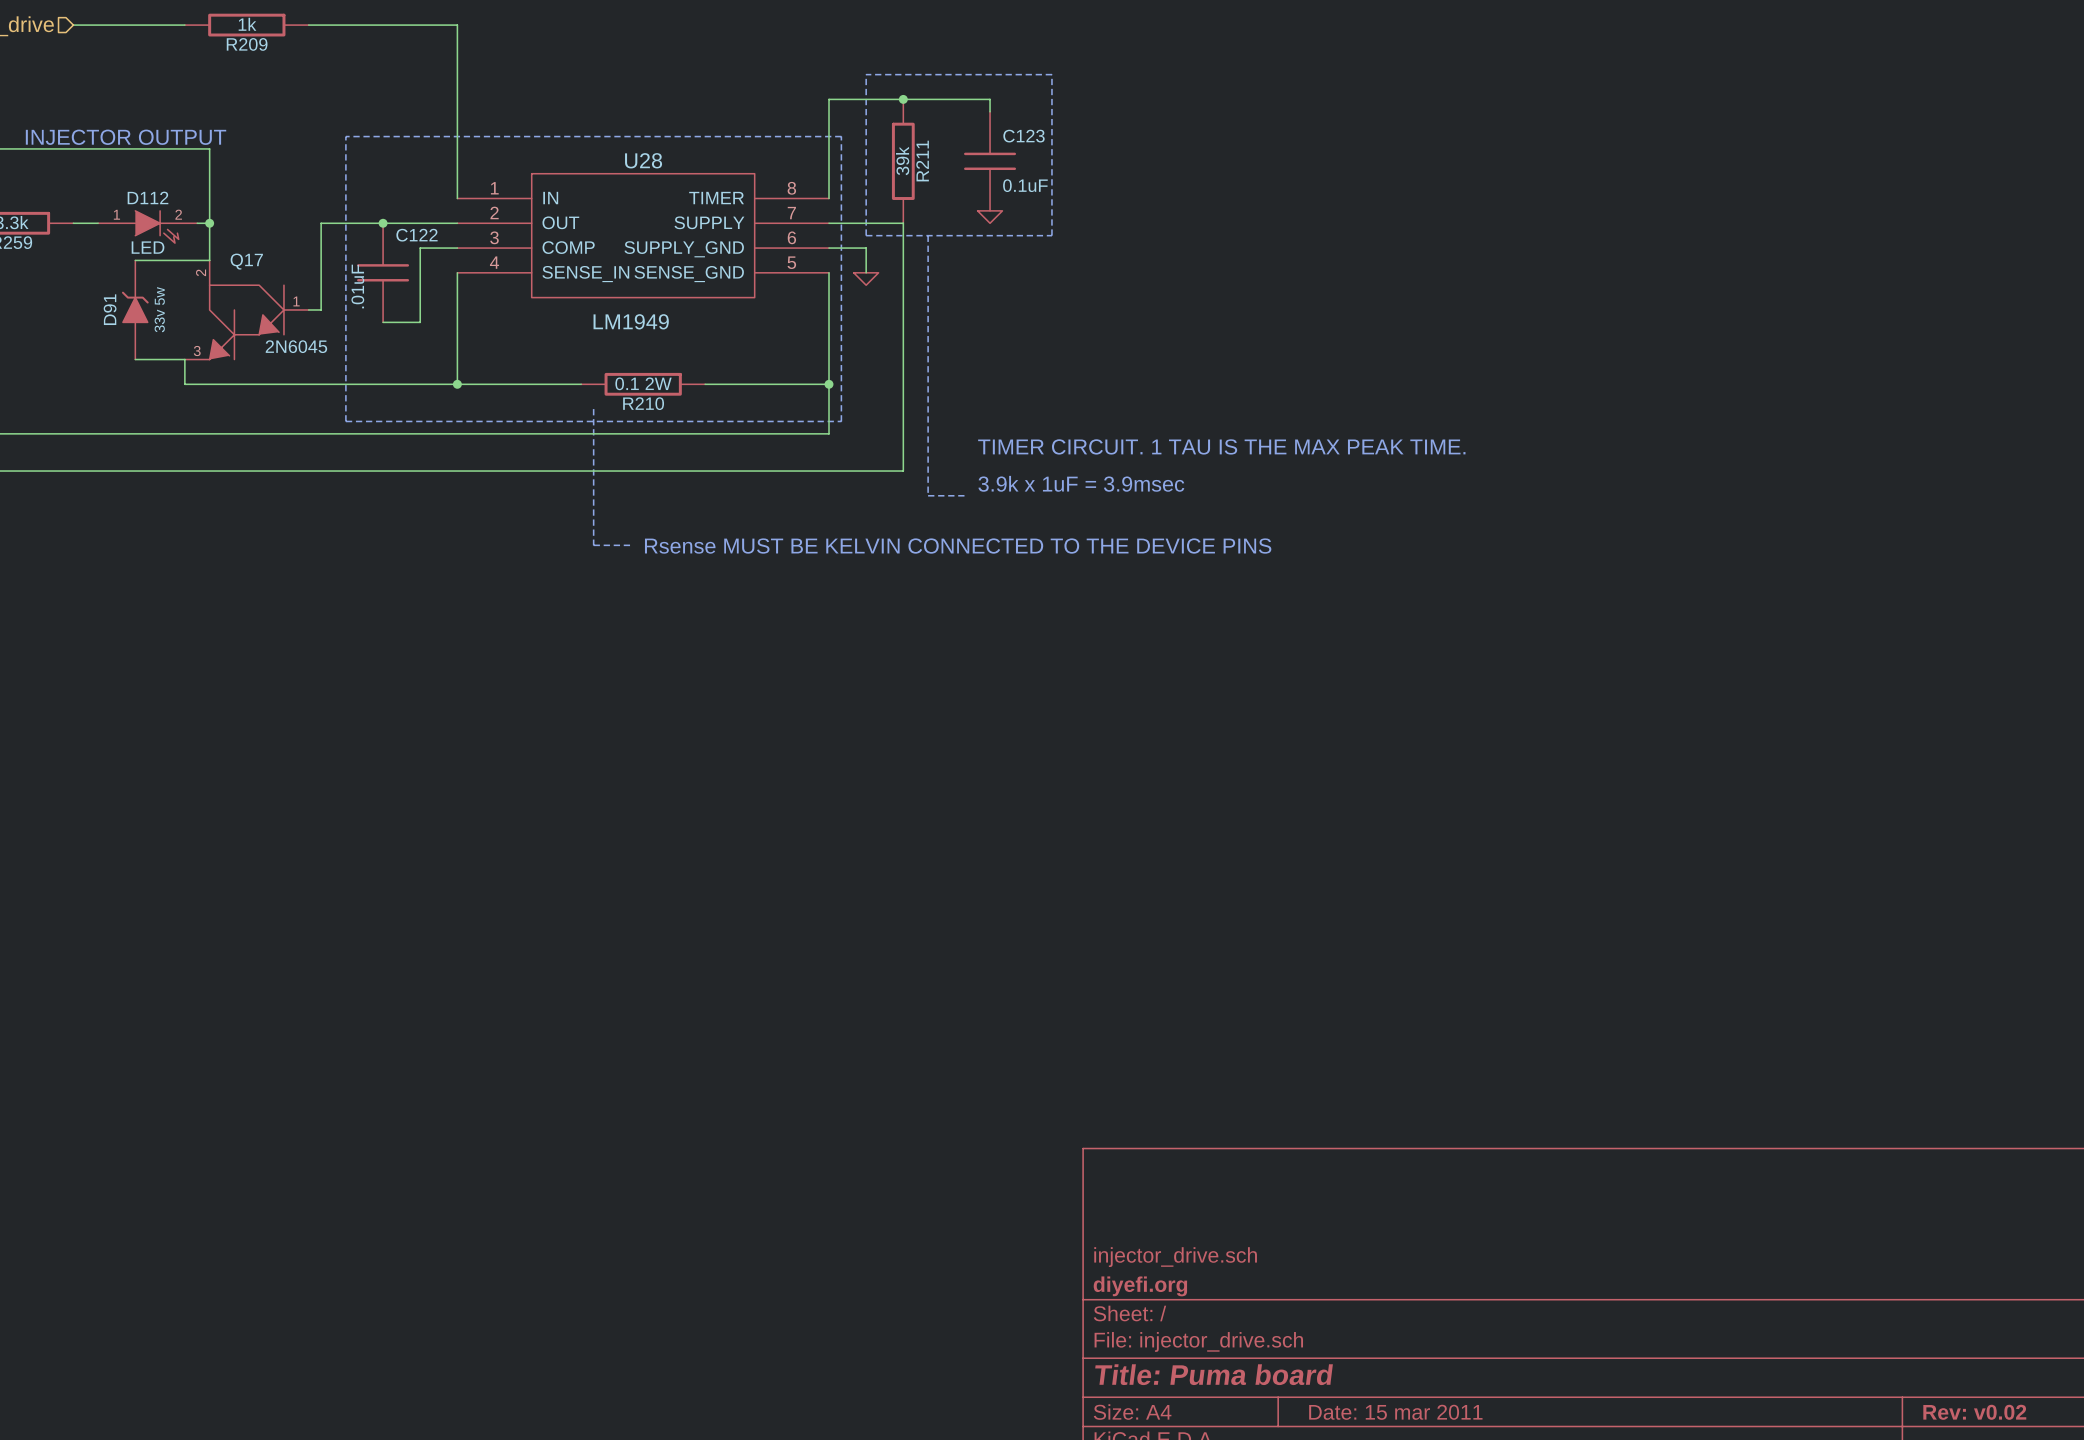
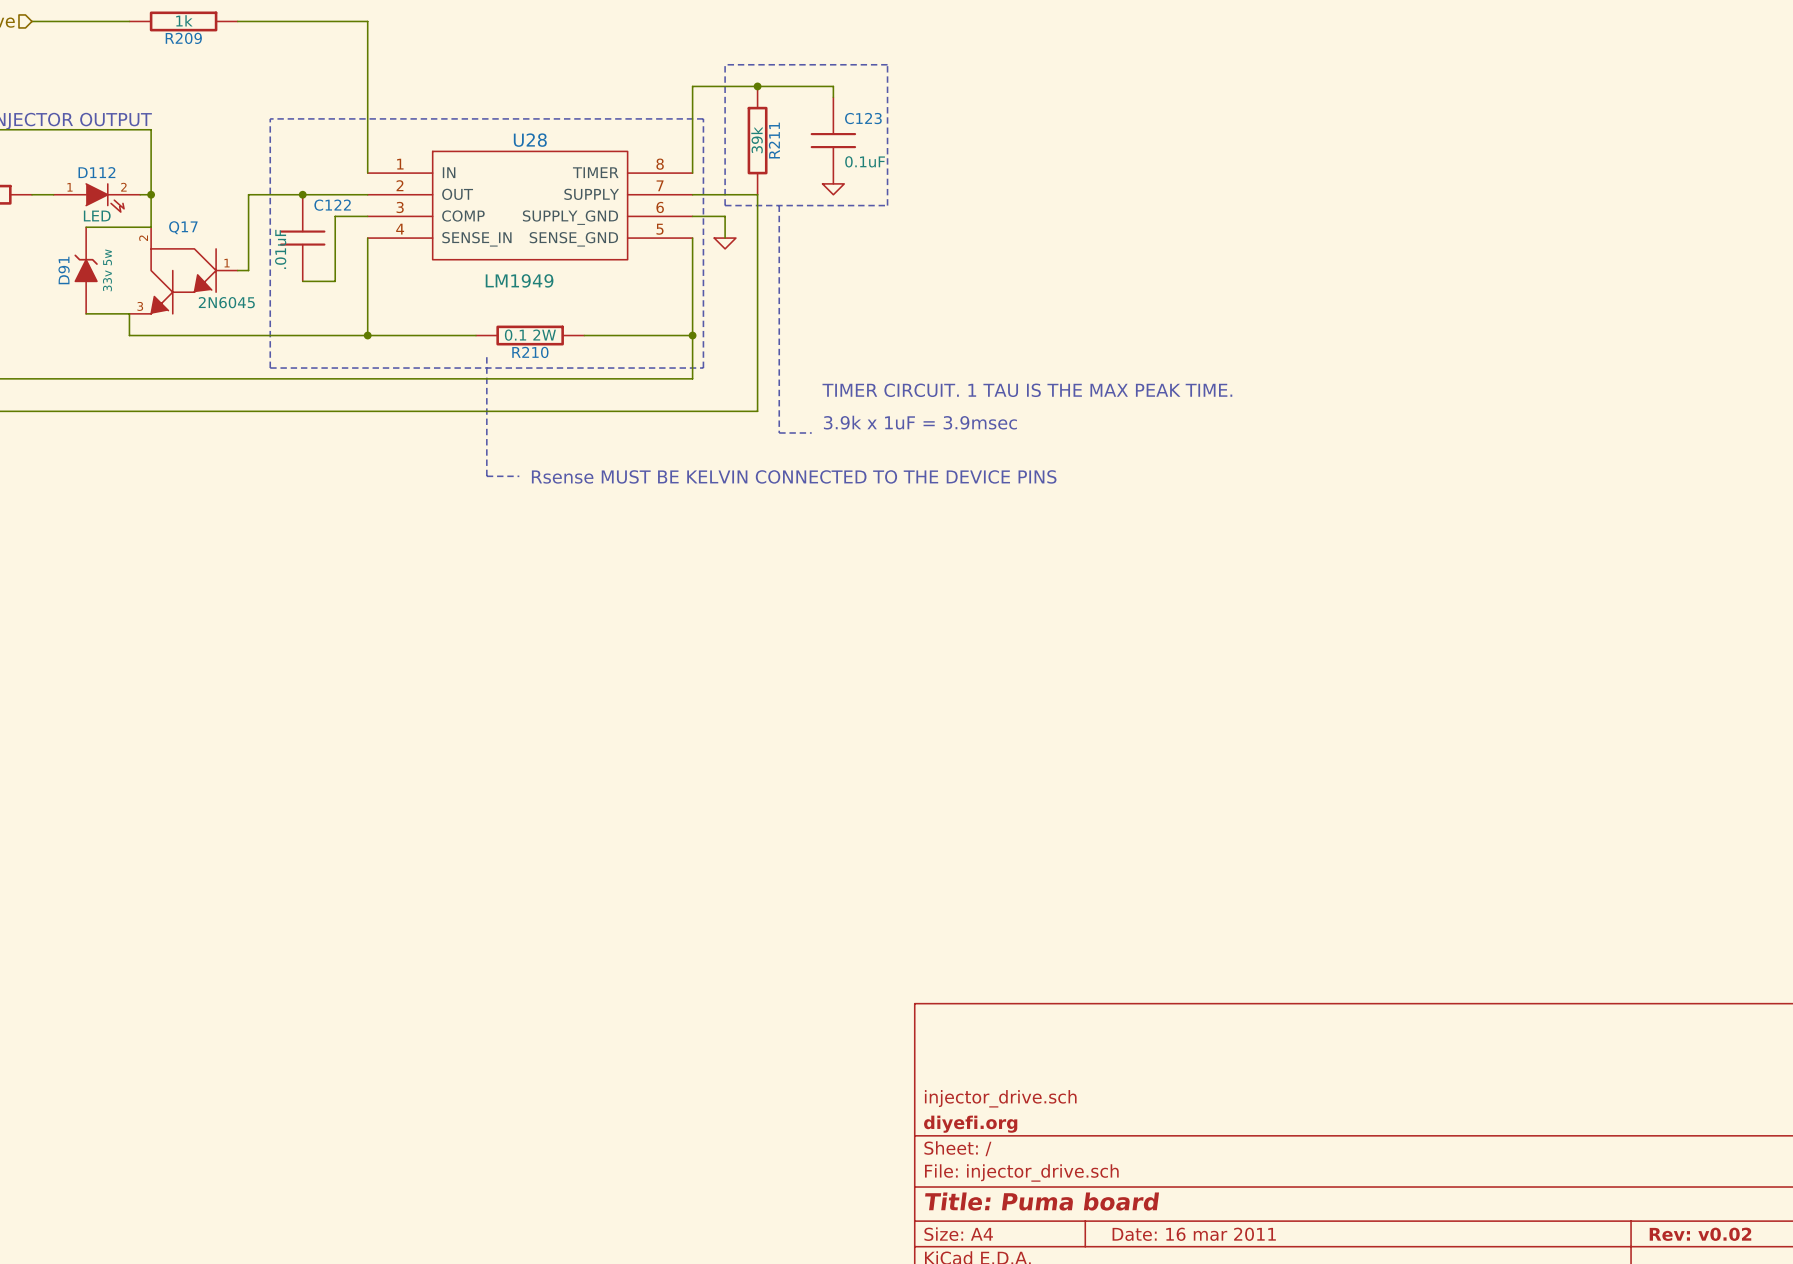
title block: Date: 15 mar 2011 (1395, 1412) -> Date: 16 mar 2011 (1194, 1234)

